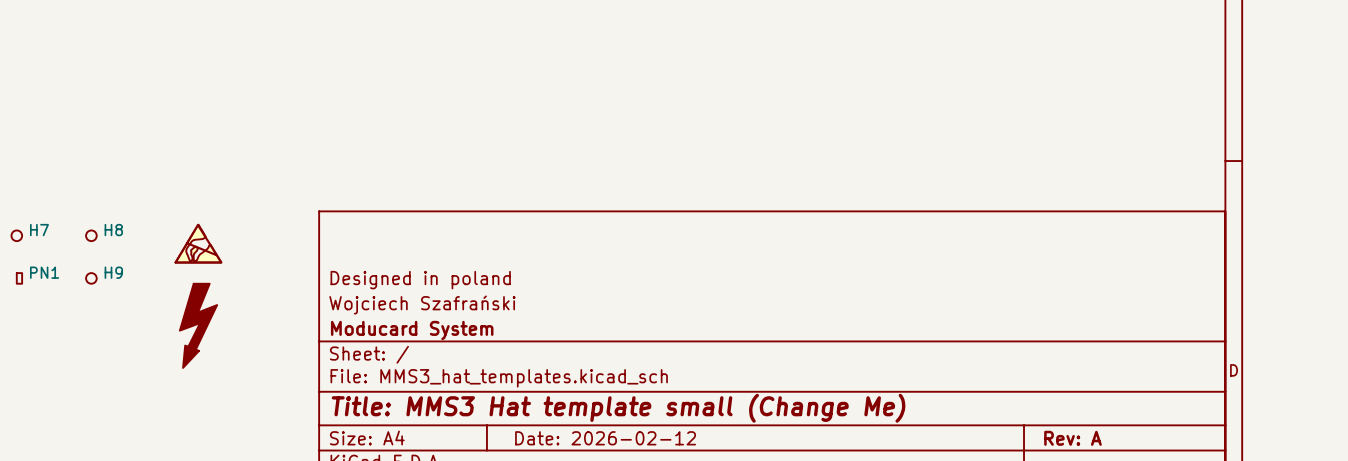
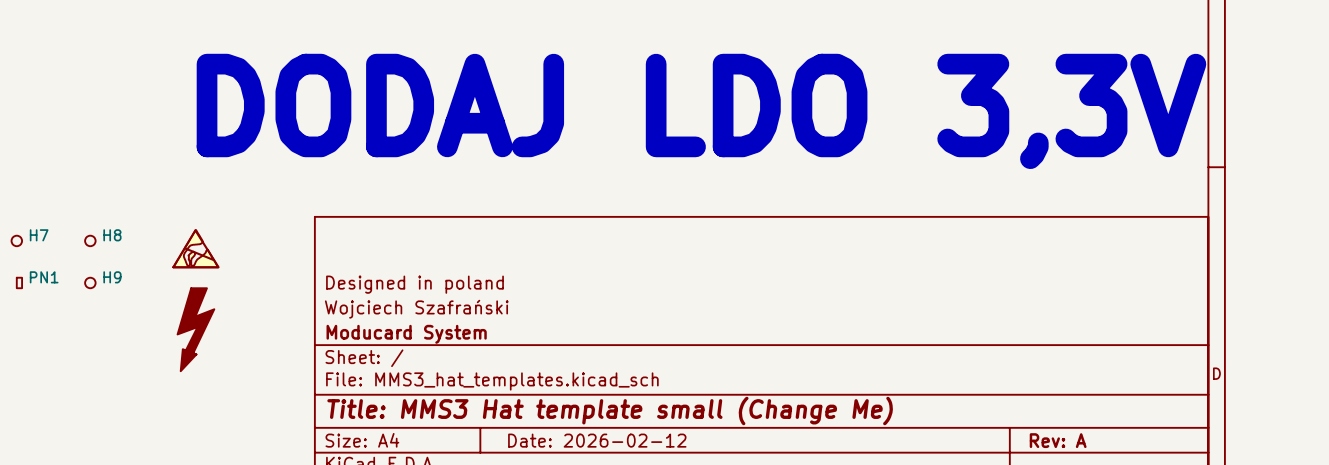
text: none -> DODAJ LDO 3,3V (701, 111)

